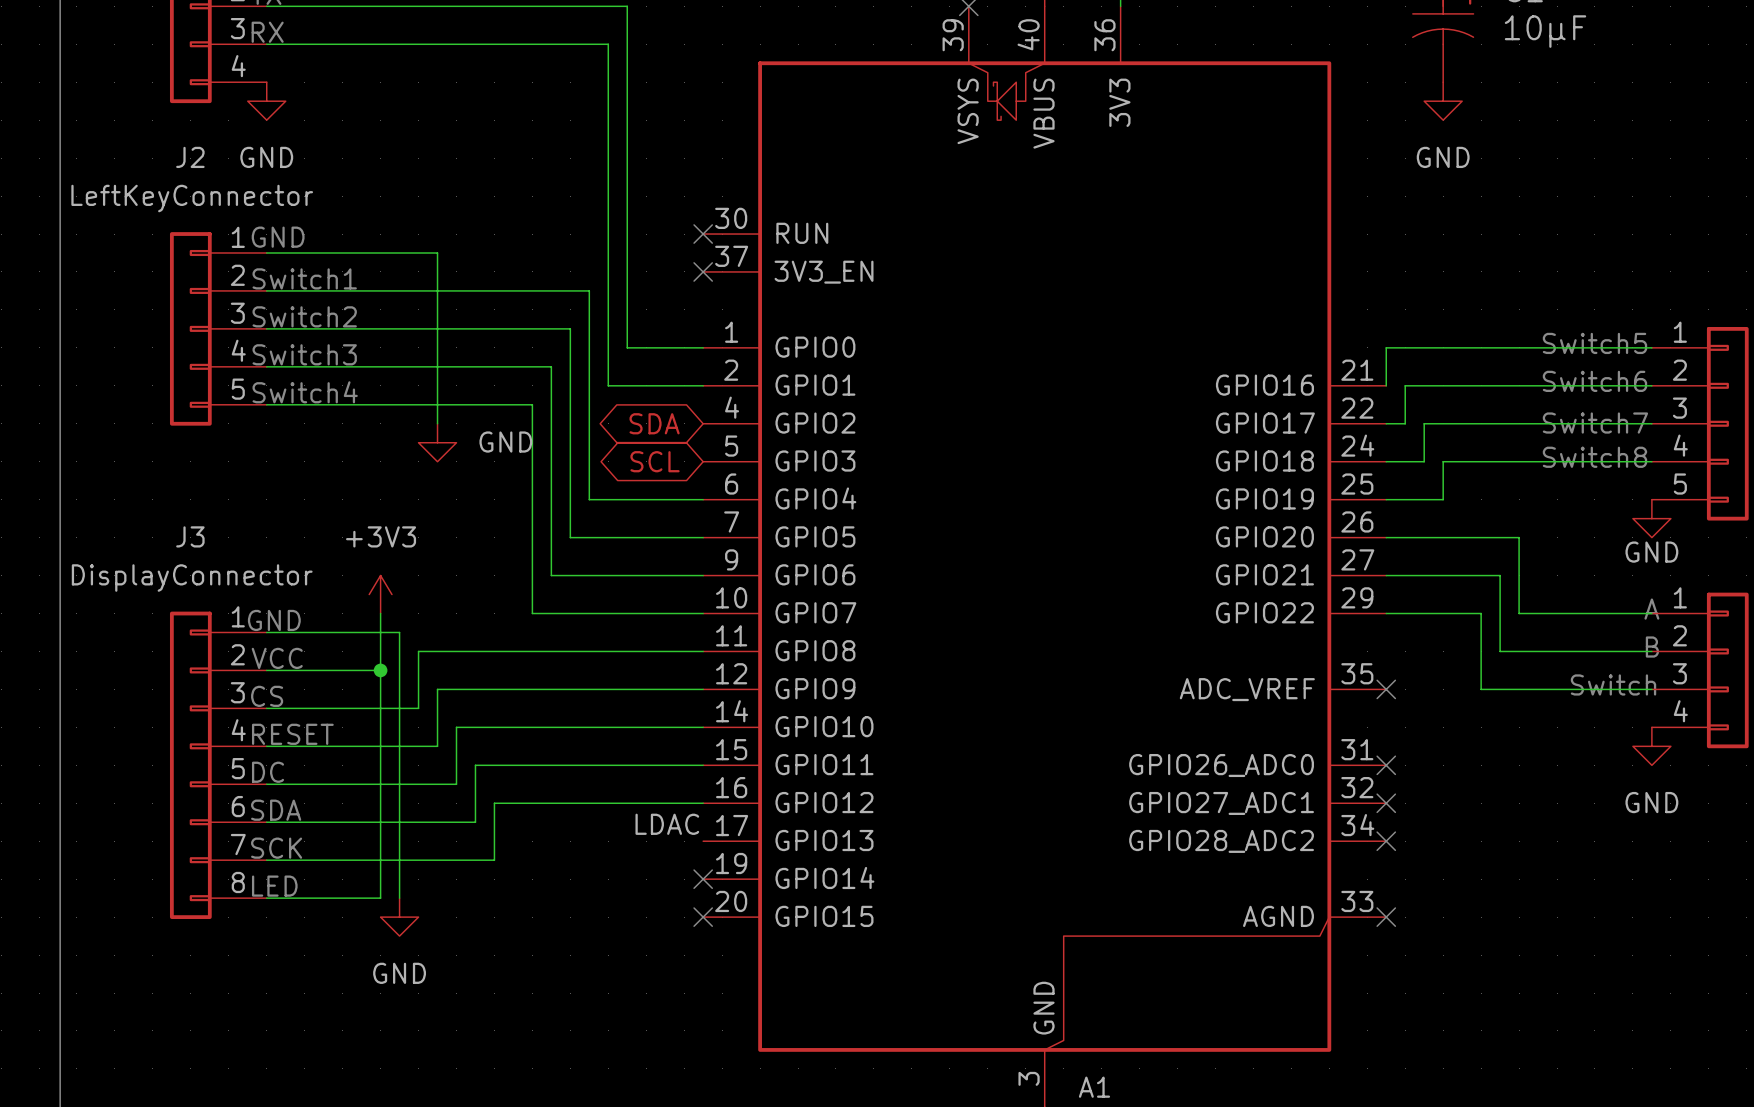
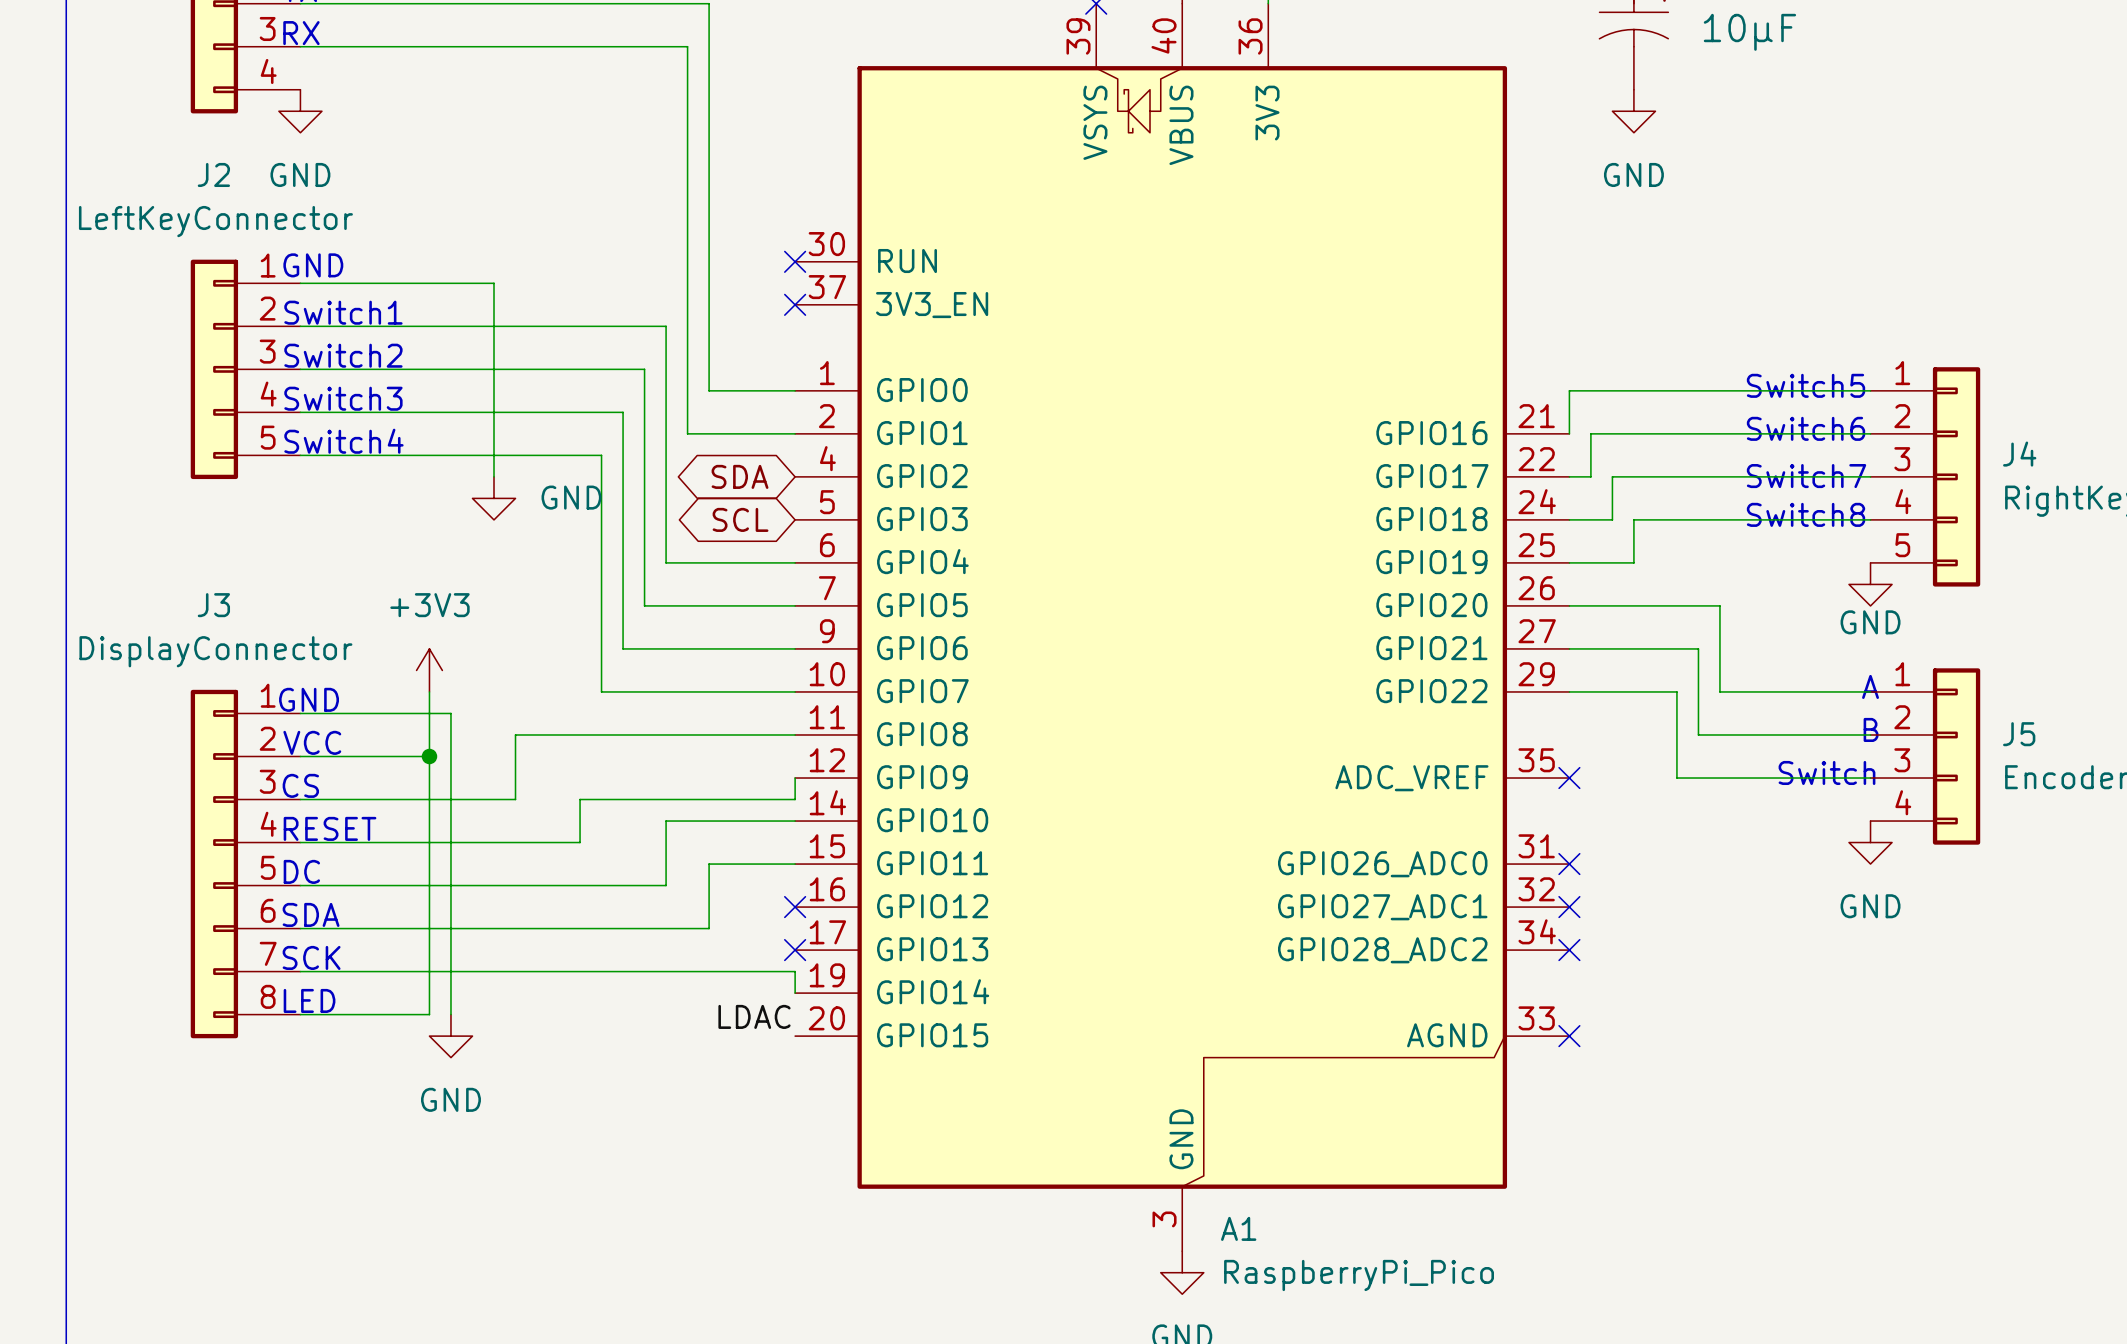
wire: (456, 651) (418, 651) (418, 708) -> (515, 734) (515, 799) (472, 799)
wire: (703, 689) (437, 689) (437, 746) -> (795, 778) (795, 799) (580, 799) (580, 842) (494, 842)
wire: (589, 727) (456, 727) (456, 784) -> (666, 821) (666, 885) (515, 885)
wire: (627, 765) (475, 765) (475, 822) -> (709, 864) (709, 928) (537, 928)
wire: (703, 803) (494, 803) (494, 860) -> (795, 993) (795, 971) (558, 971)
no-connect mark: none -> (795, 907)
label position: LDAC (667, 824) -> LDAC (754, 1016)
no-connect mark: none -> (795, 950)
no-connect mark: (703, 879) -> none
no-connect mark: (703, 917) -> none

